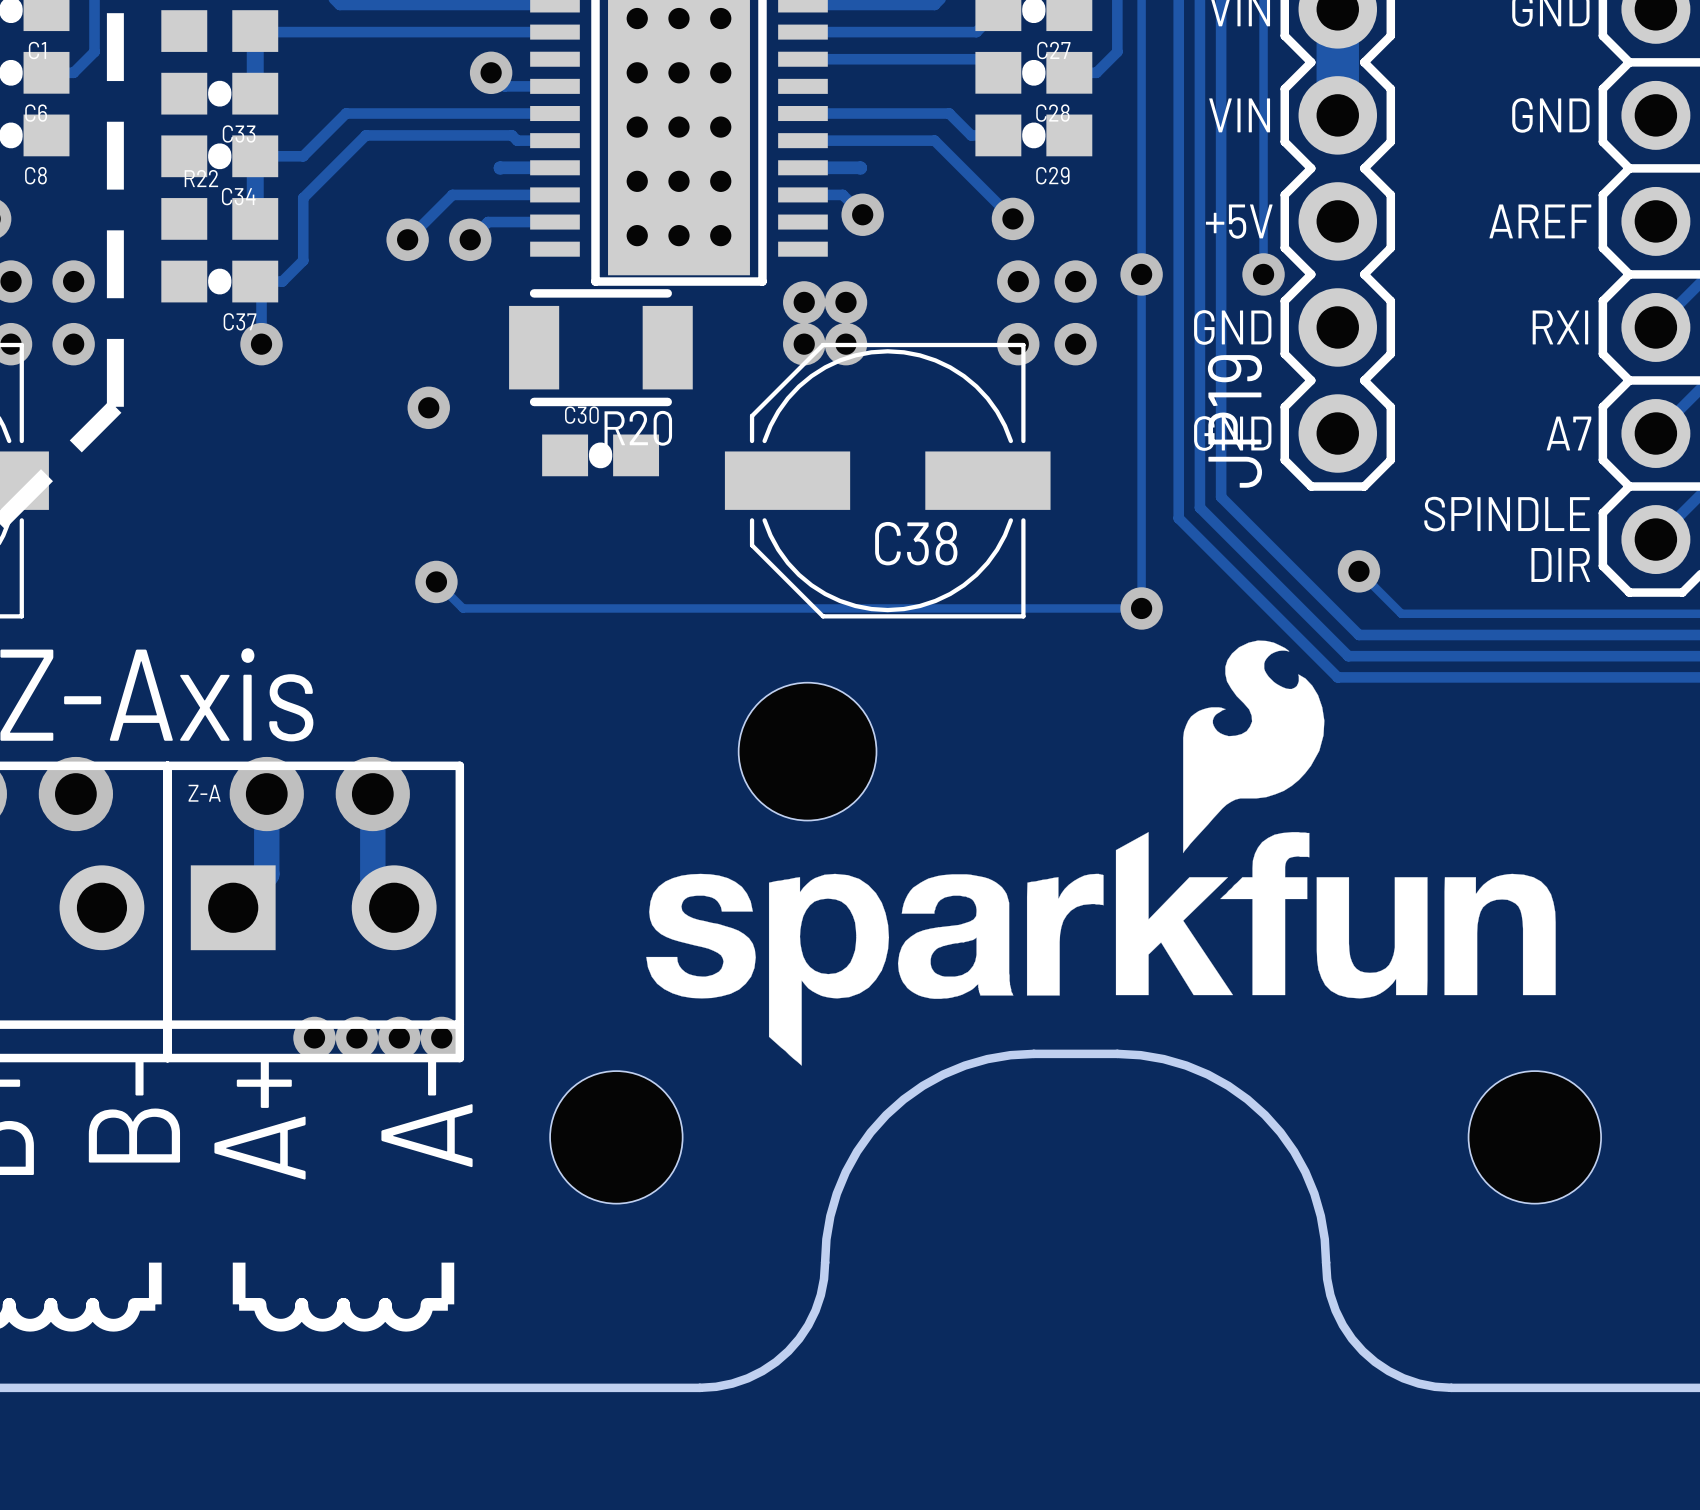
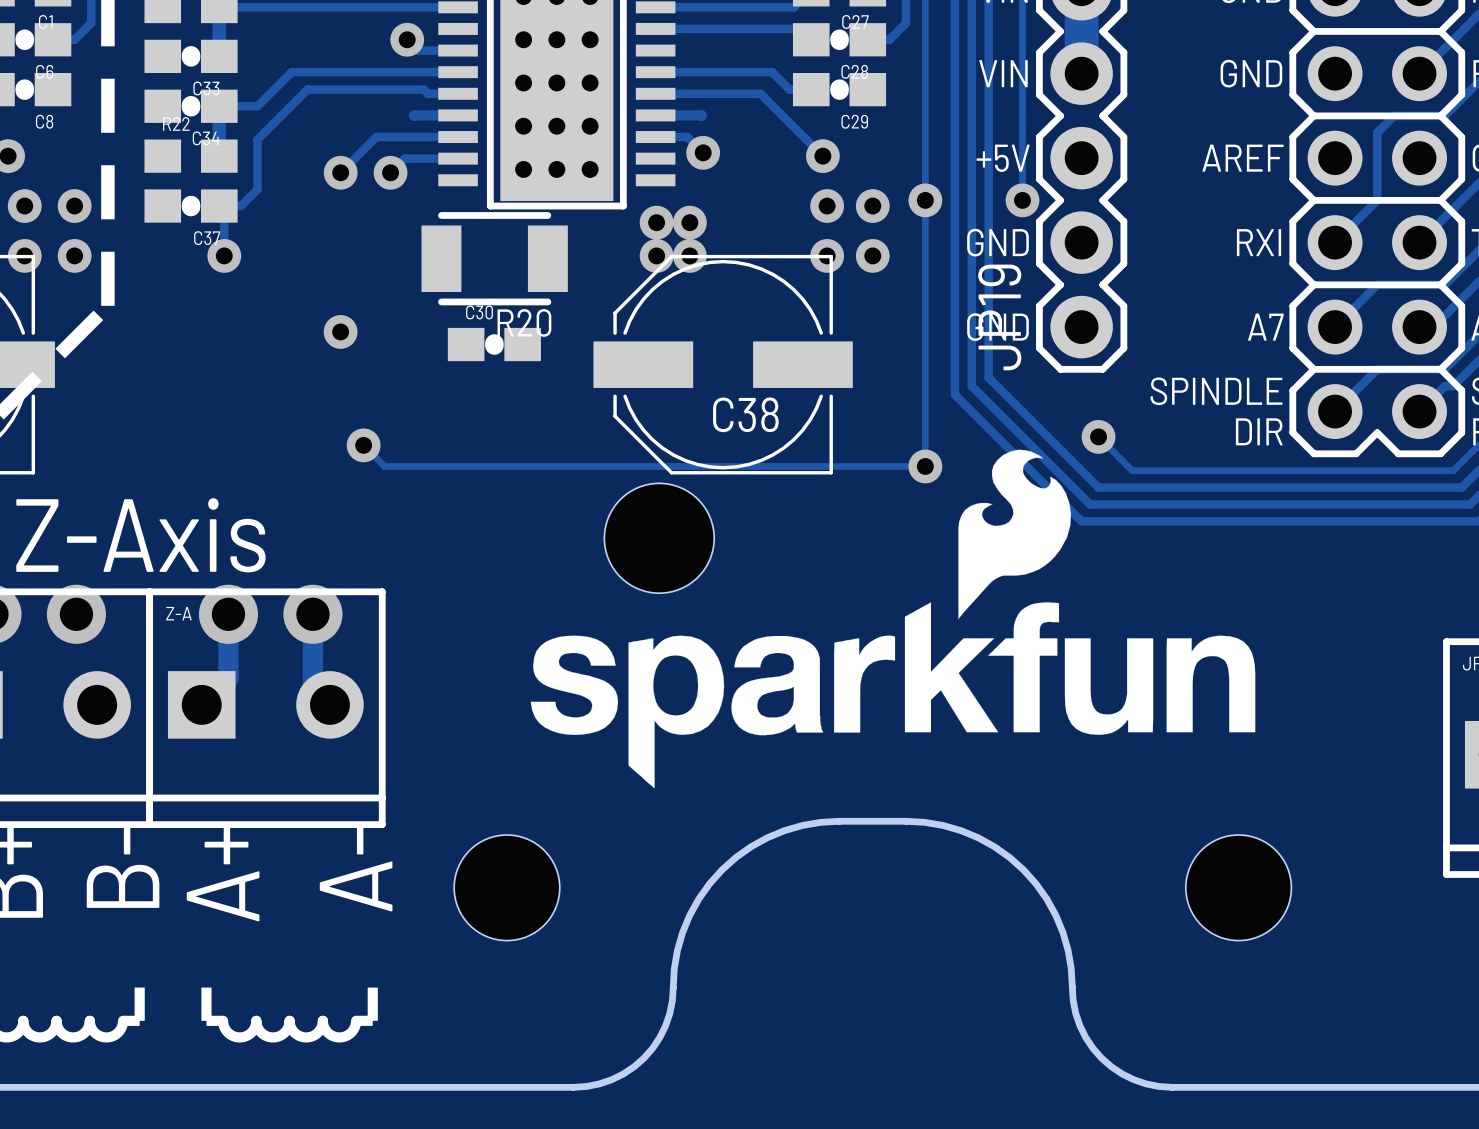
via position: (428, 407) -> (340, 331)
part position: (807, 751) -> (659, 538)
drawing position: (1100, 853) -> (893, 619)
via: (314, 1037) -> none
via: (356, 1037) -> none
via: (399, 1037) -> none
via: (441, 1037) -> none

